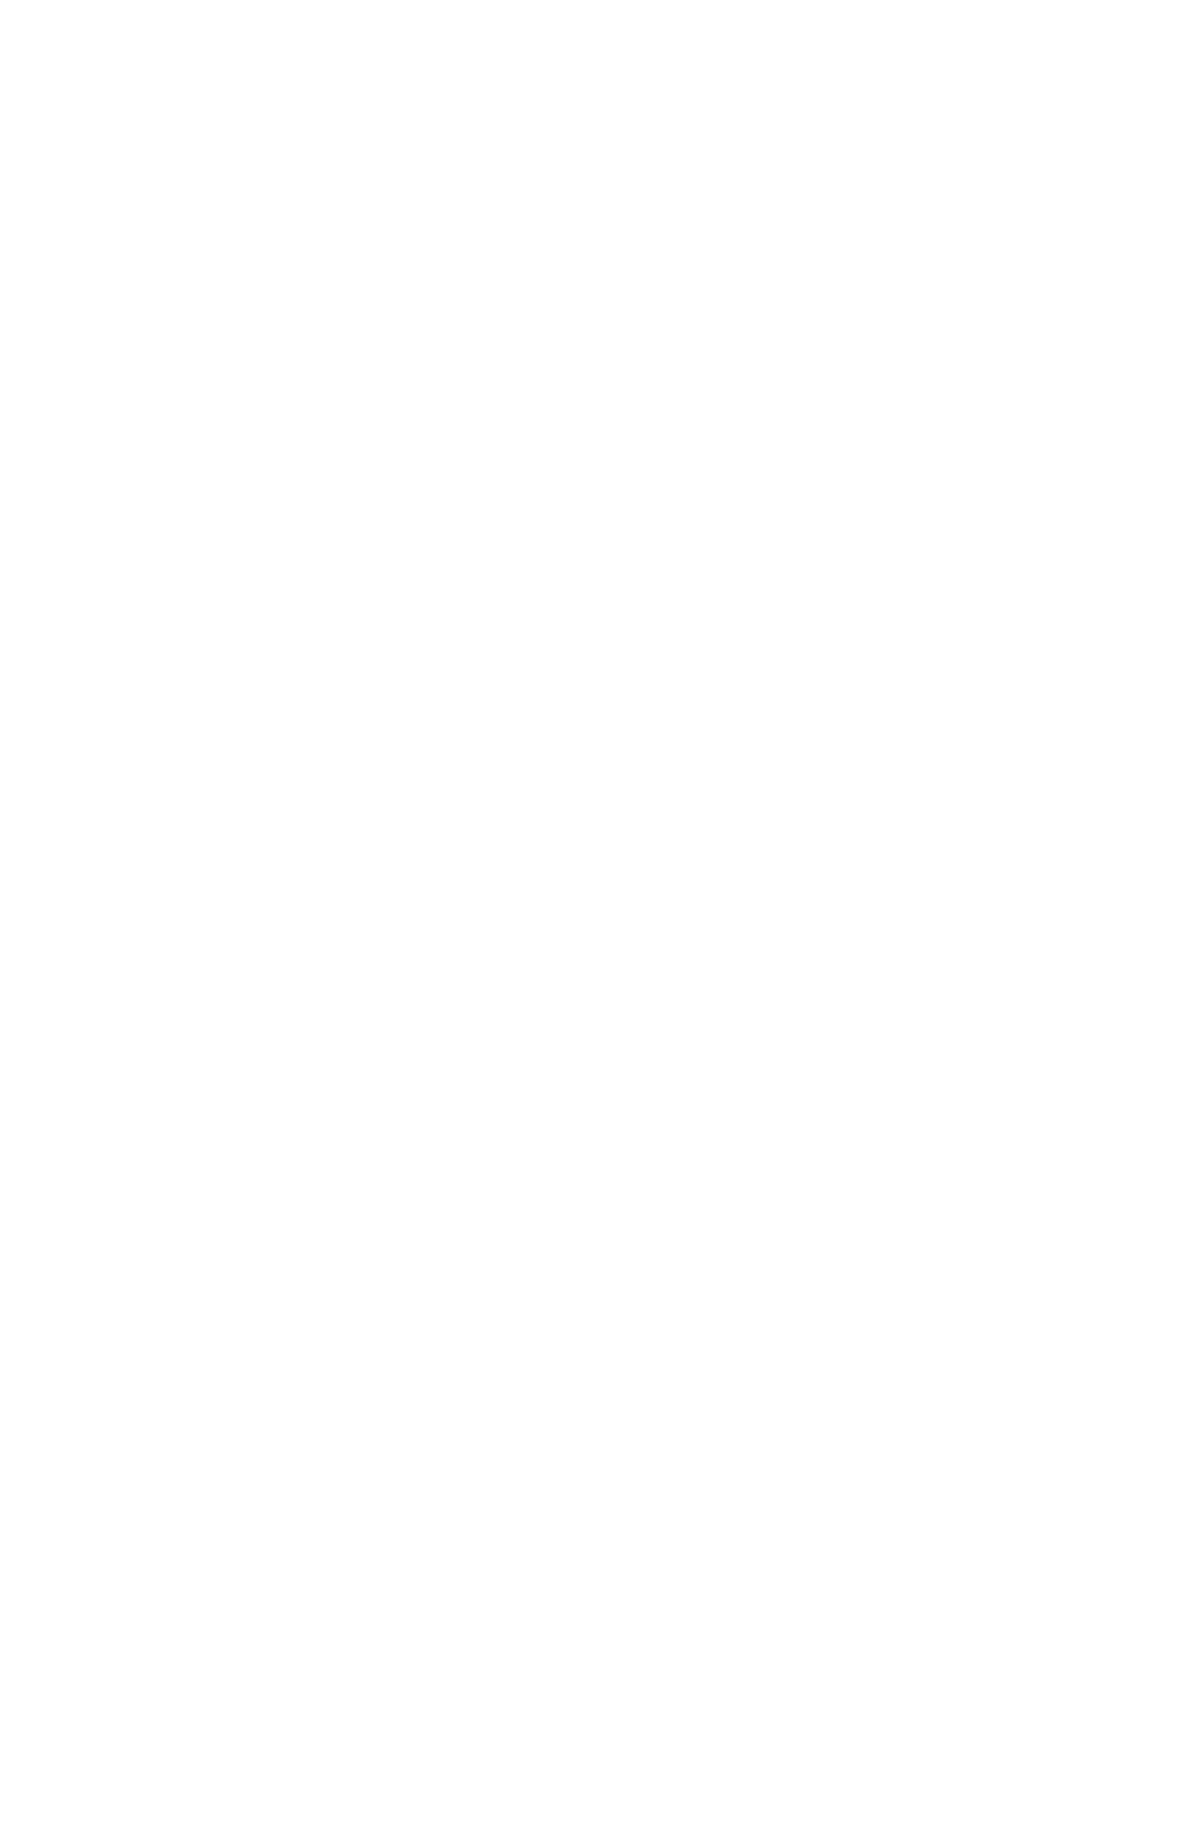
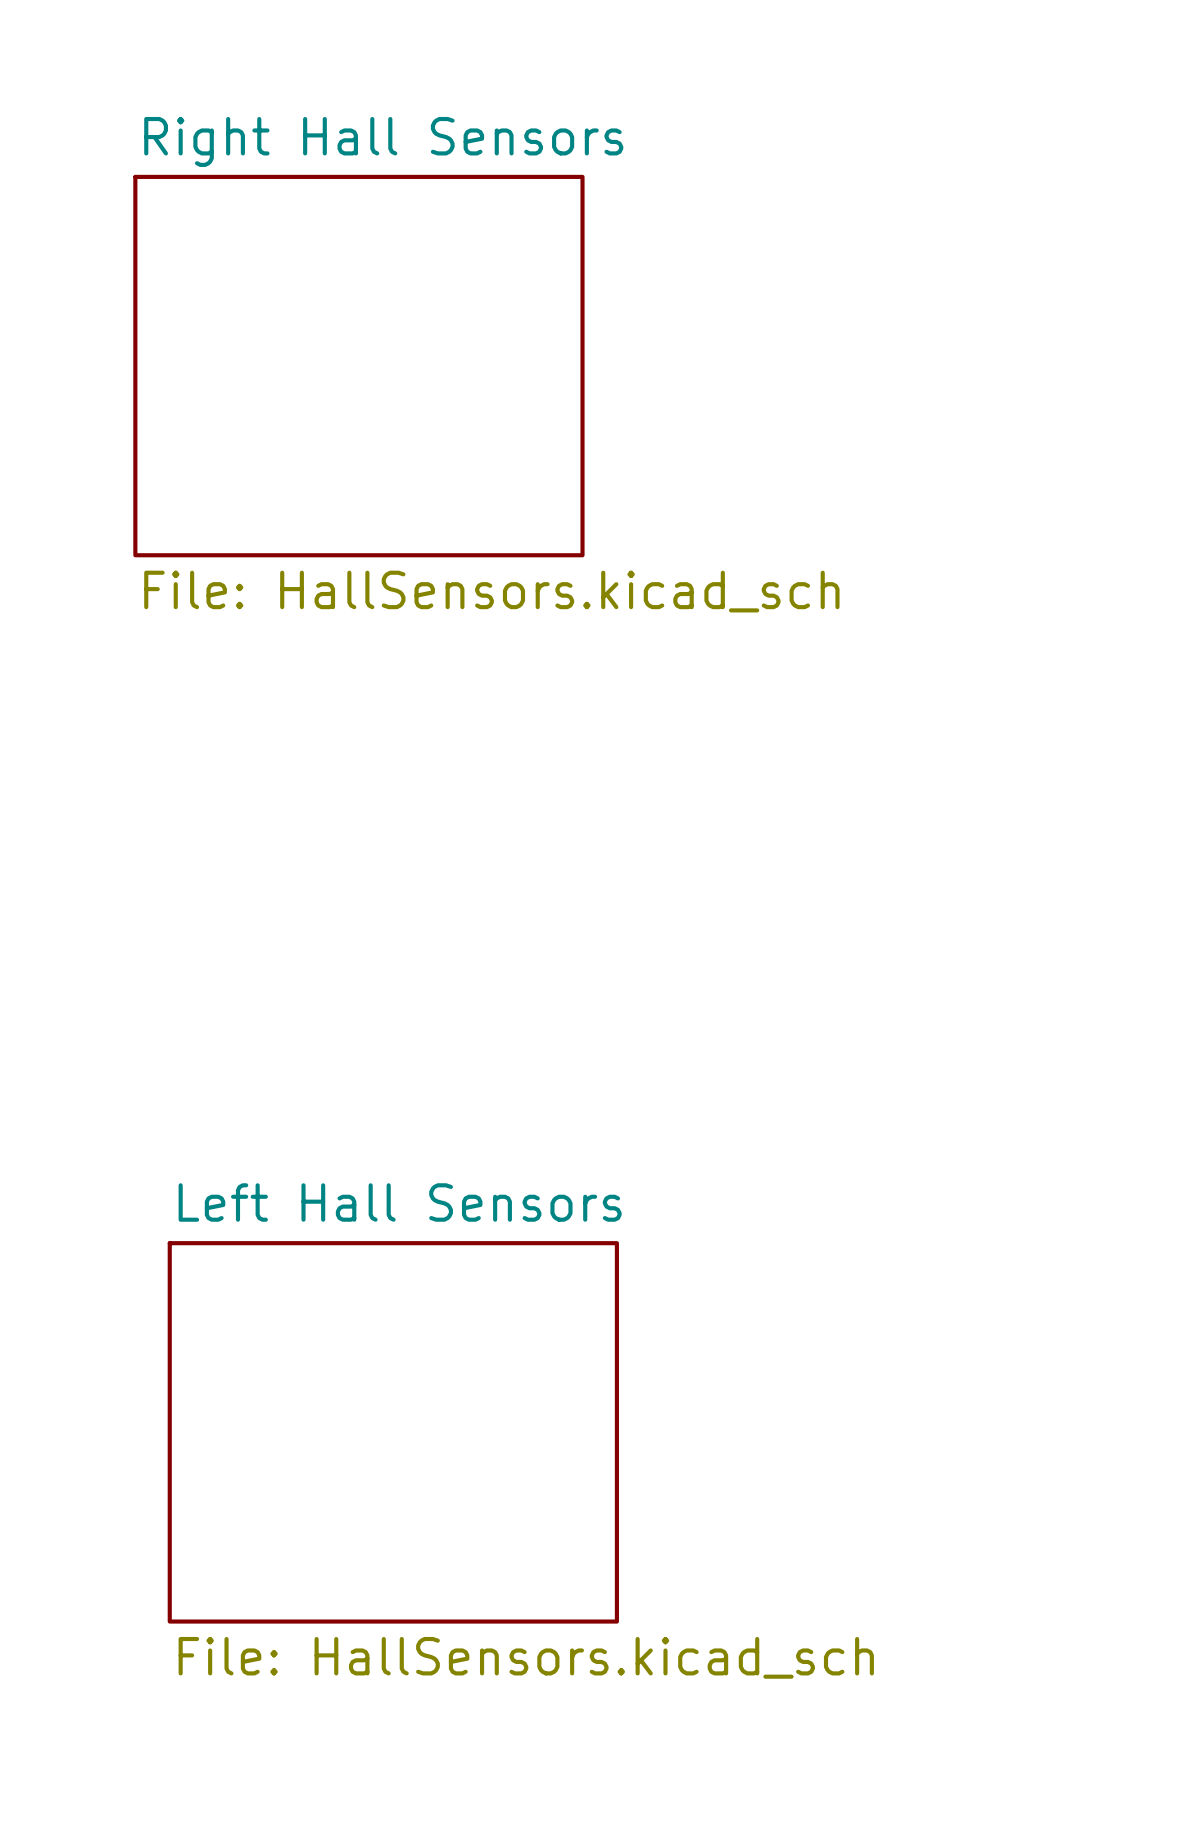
sheet Right Hall Sensors: none -> File: HallSensors.kicad_sch (358, 366)
sheet Left Hall Sensors: none -> File: HallSensors.kicad_sch (393, 1432)

